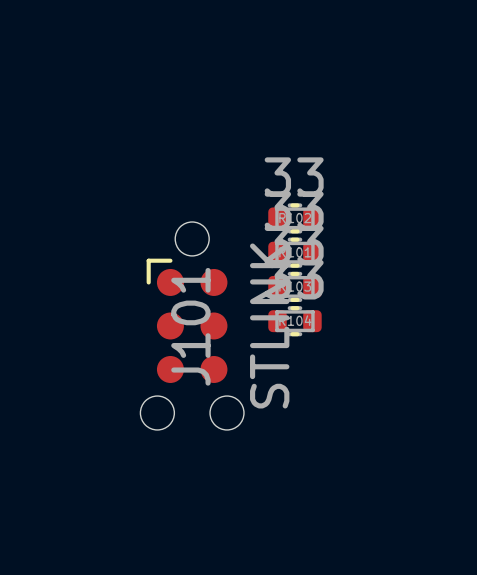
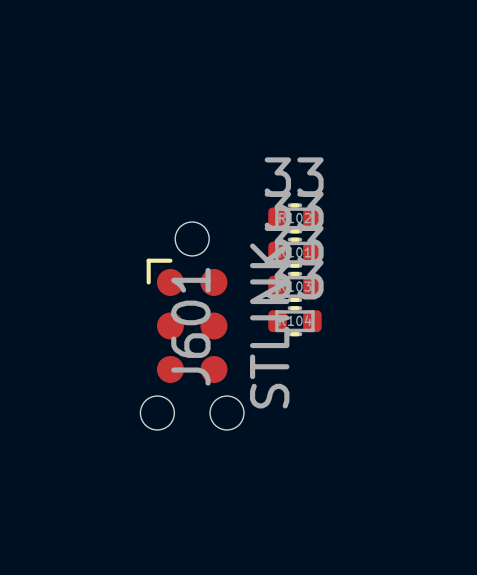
J101 name: J101 (190, 326) -> J601 (190, 326)

